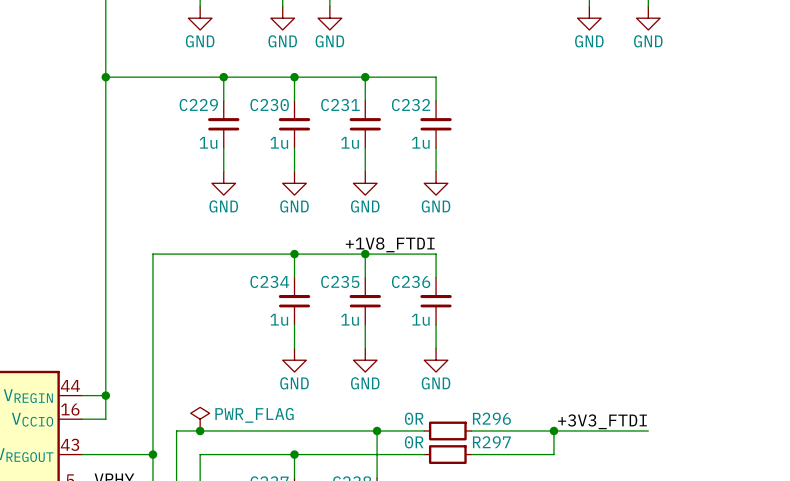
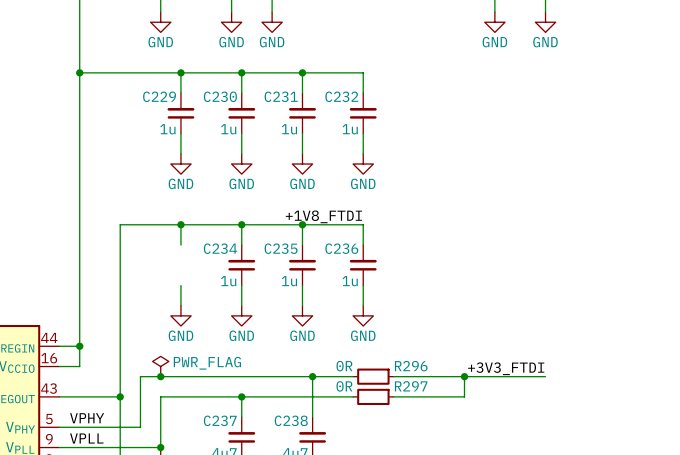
wire: none -> (180, 224) (180, 245)
junction: none -> (180, 224)
wire: none -> (180, 285) (180, 305)
power symbol: none -> GND (180, 315)

